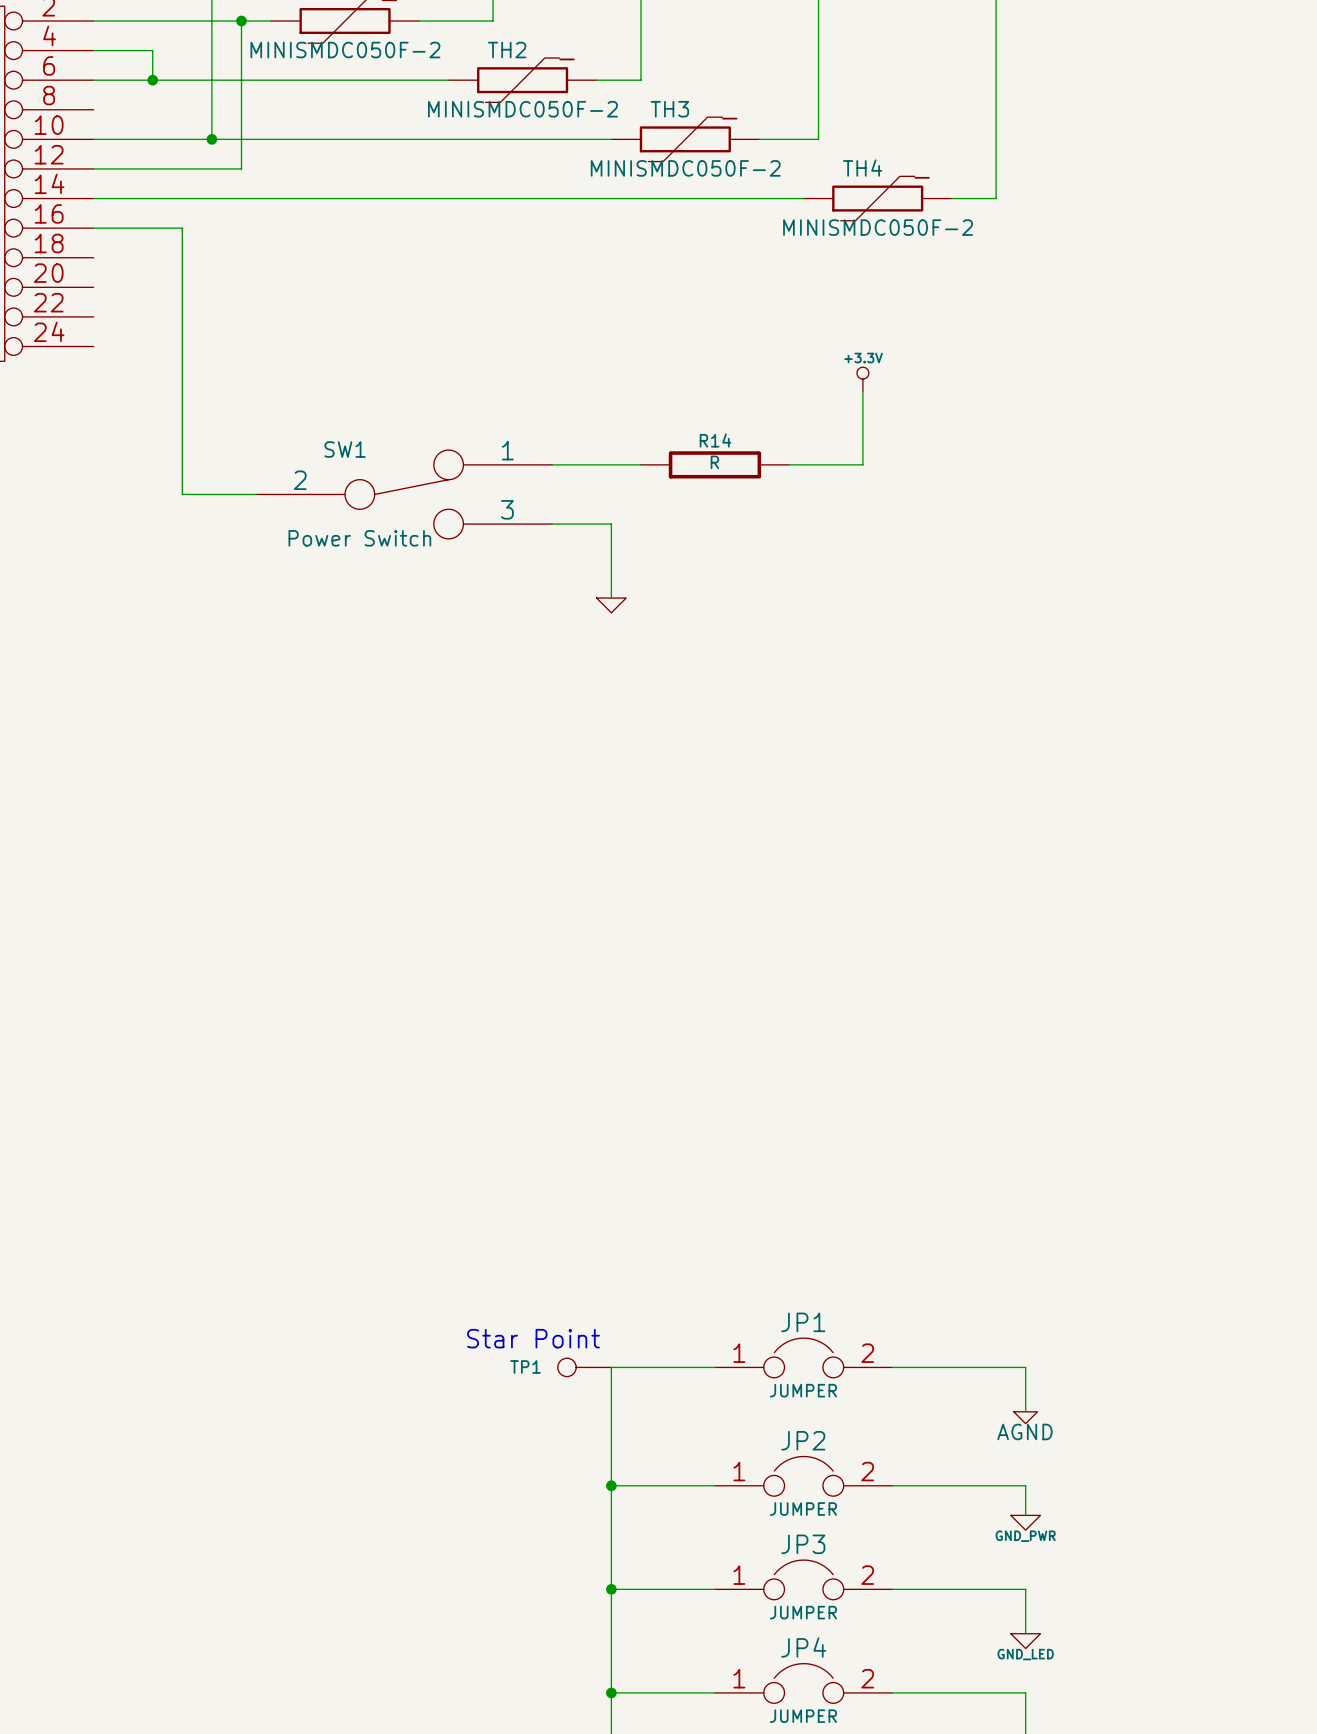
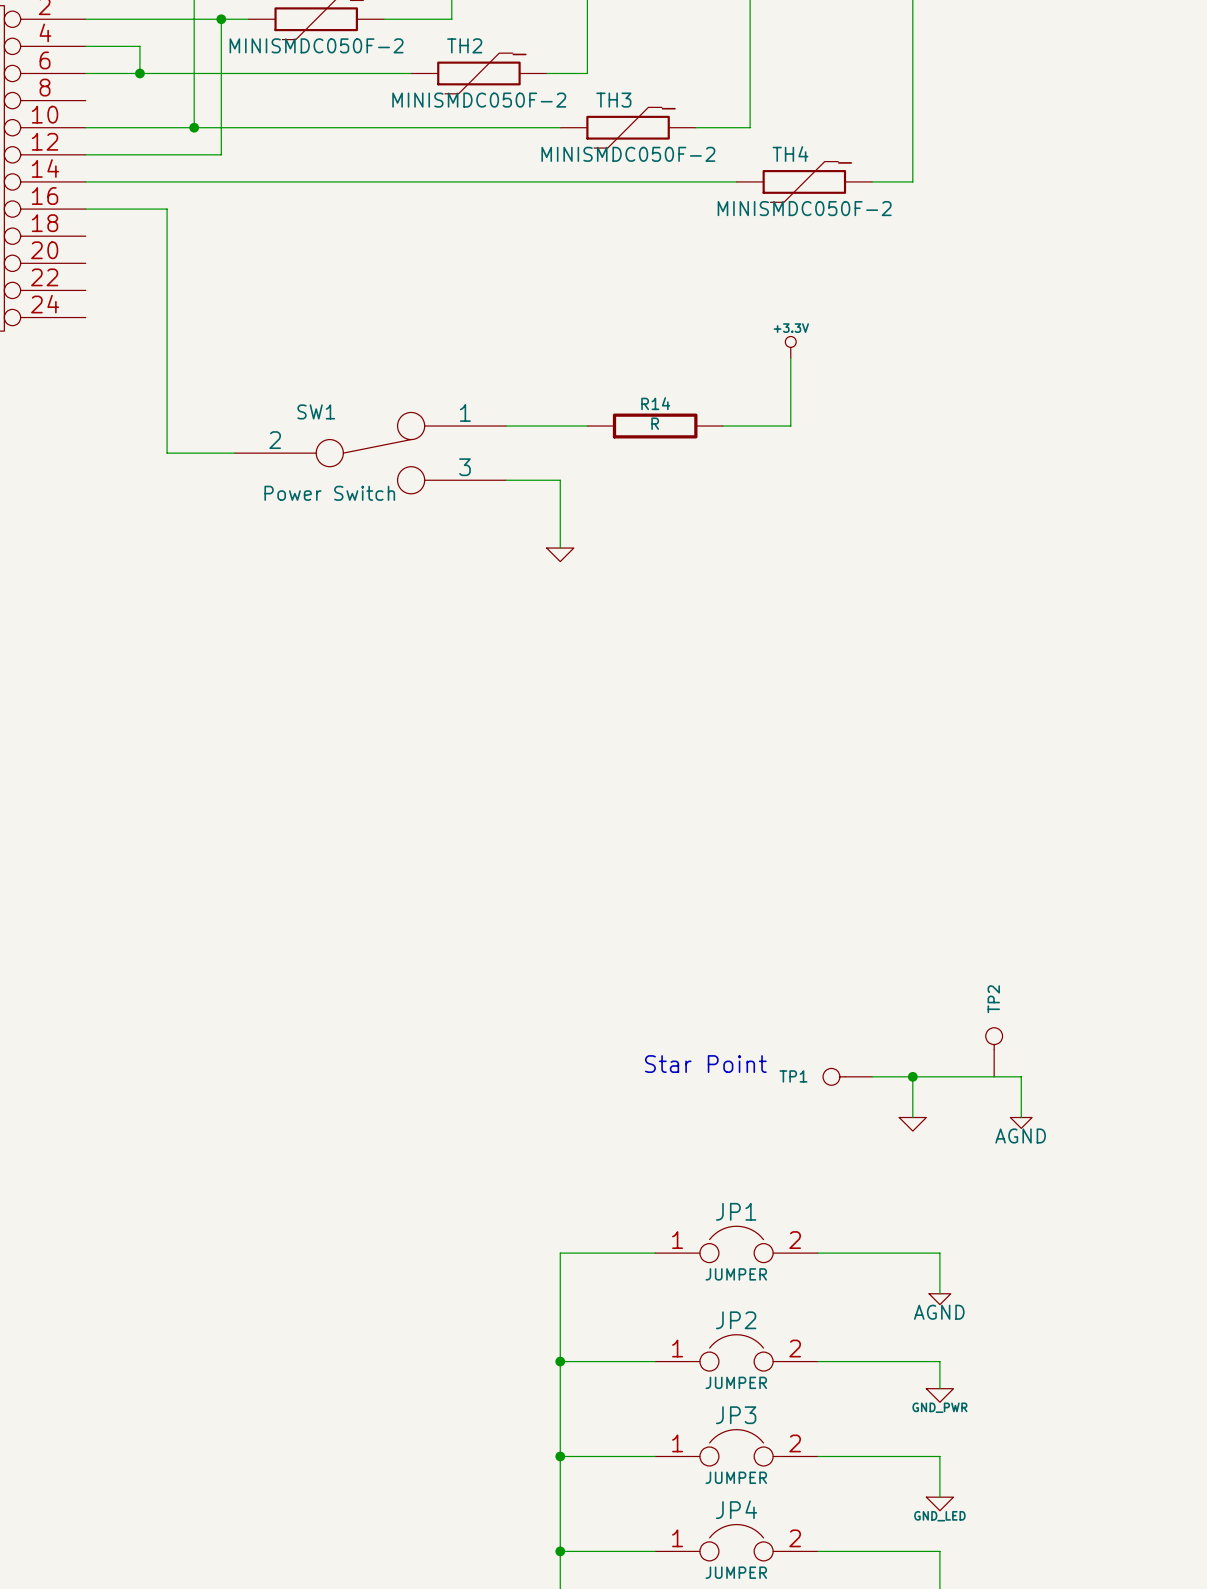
TP2: none -> (994, 1052)
text: none -> Star Point (705, 1064)
wire: none -> (872, 1076) (1021, 1076) (1021, 1117)
wire: none -> (912, 1076) (912, 1117)
junction: none -> (912, 1076)
power symbol: none -> AGND (1021, 1122)
power symbol: none -> (912, 1124)
text: Star Point (533, 1338) -> none
TP1 position: (584, 1367) -> (847, 1076)

